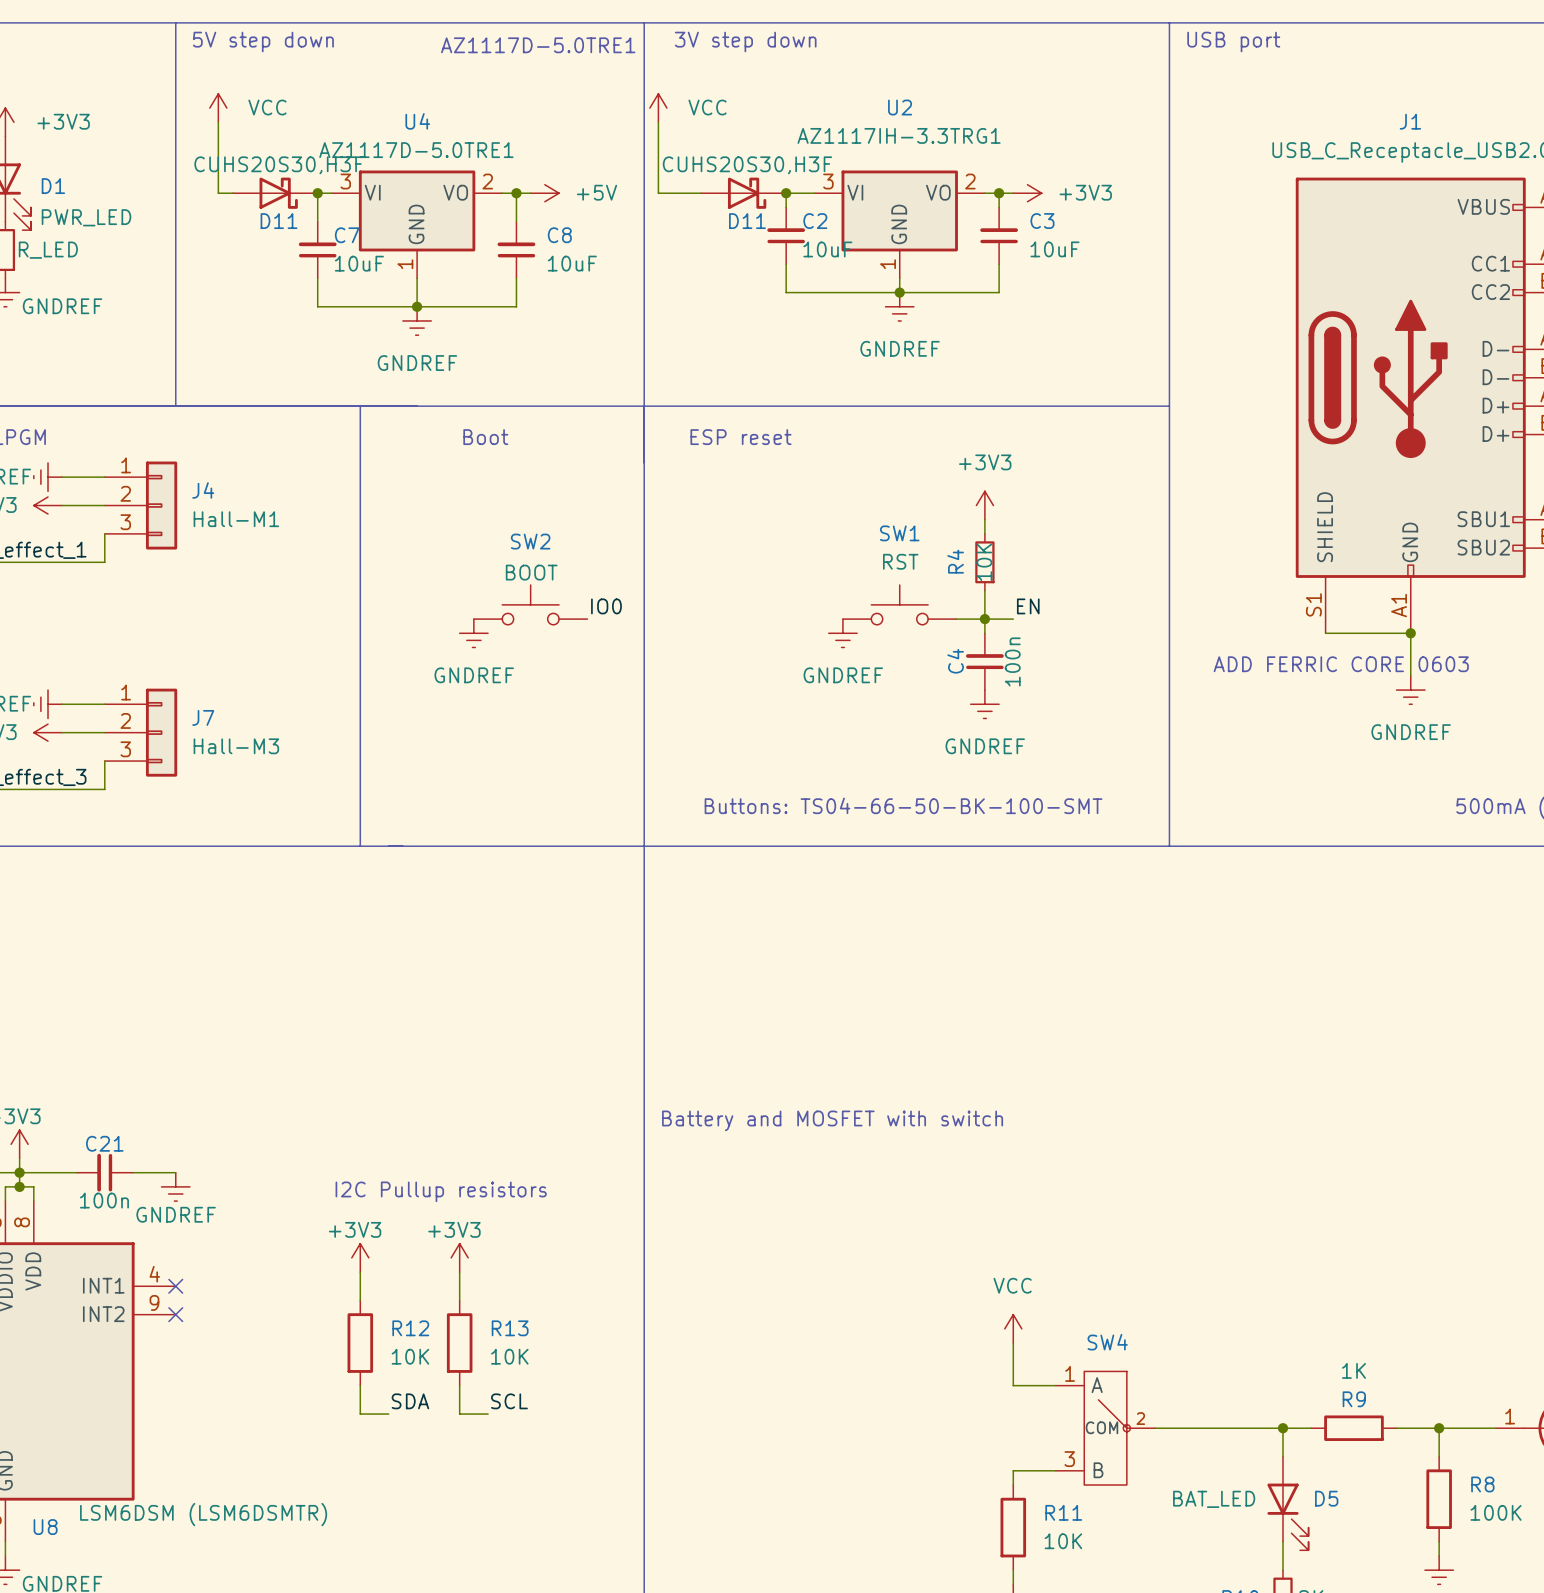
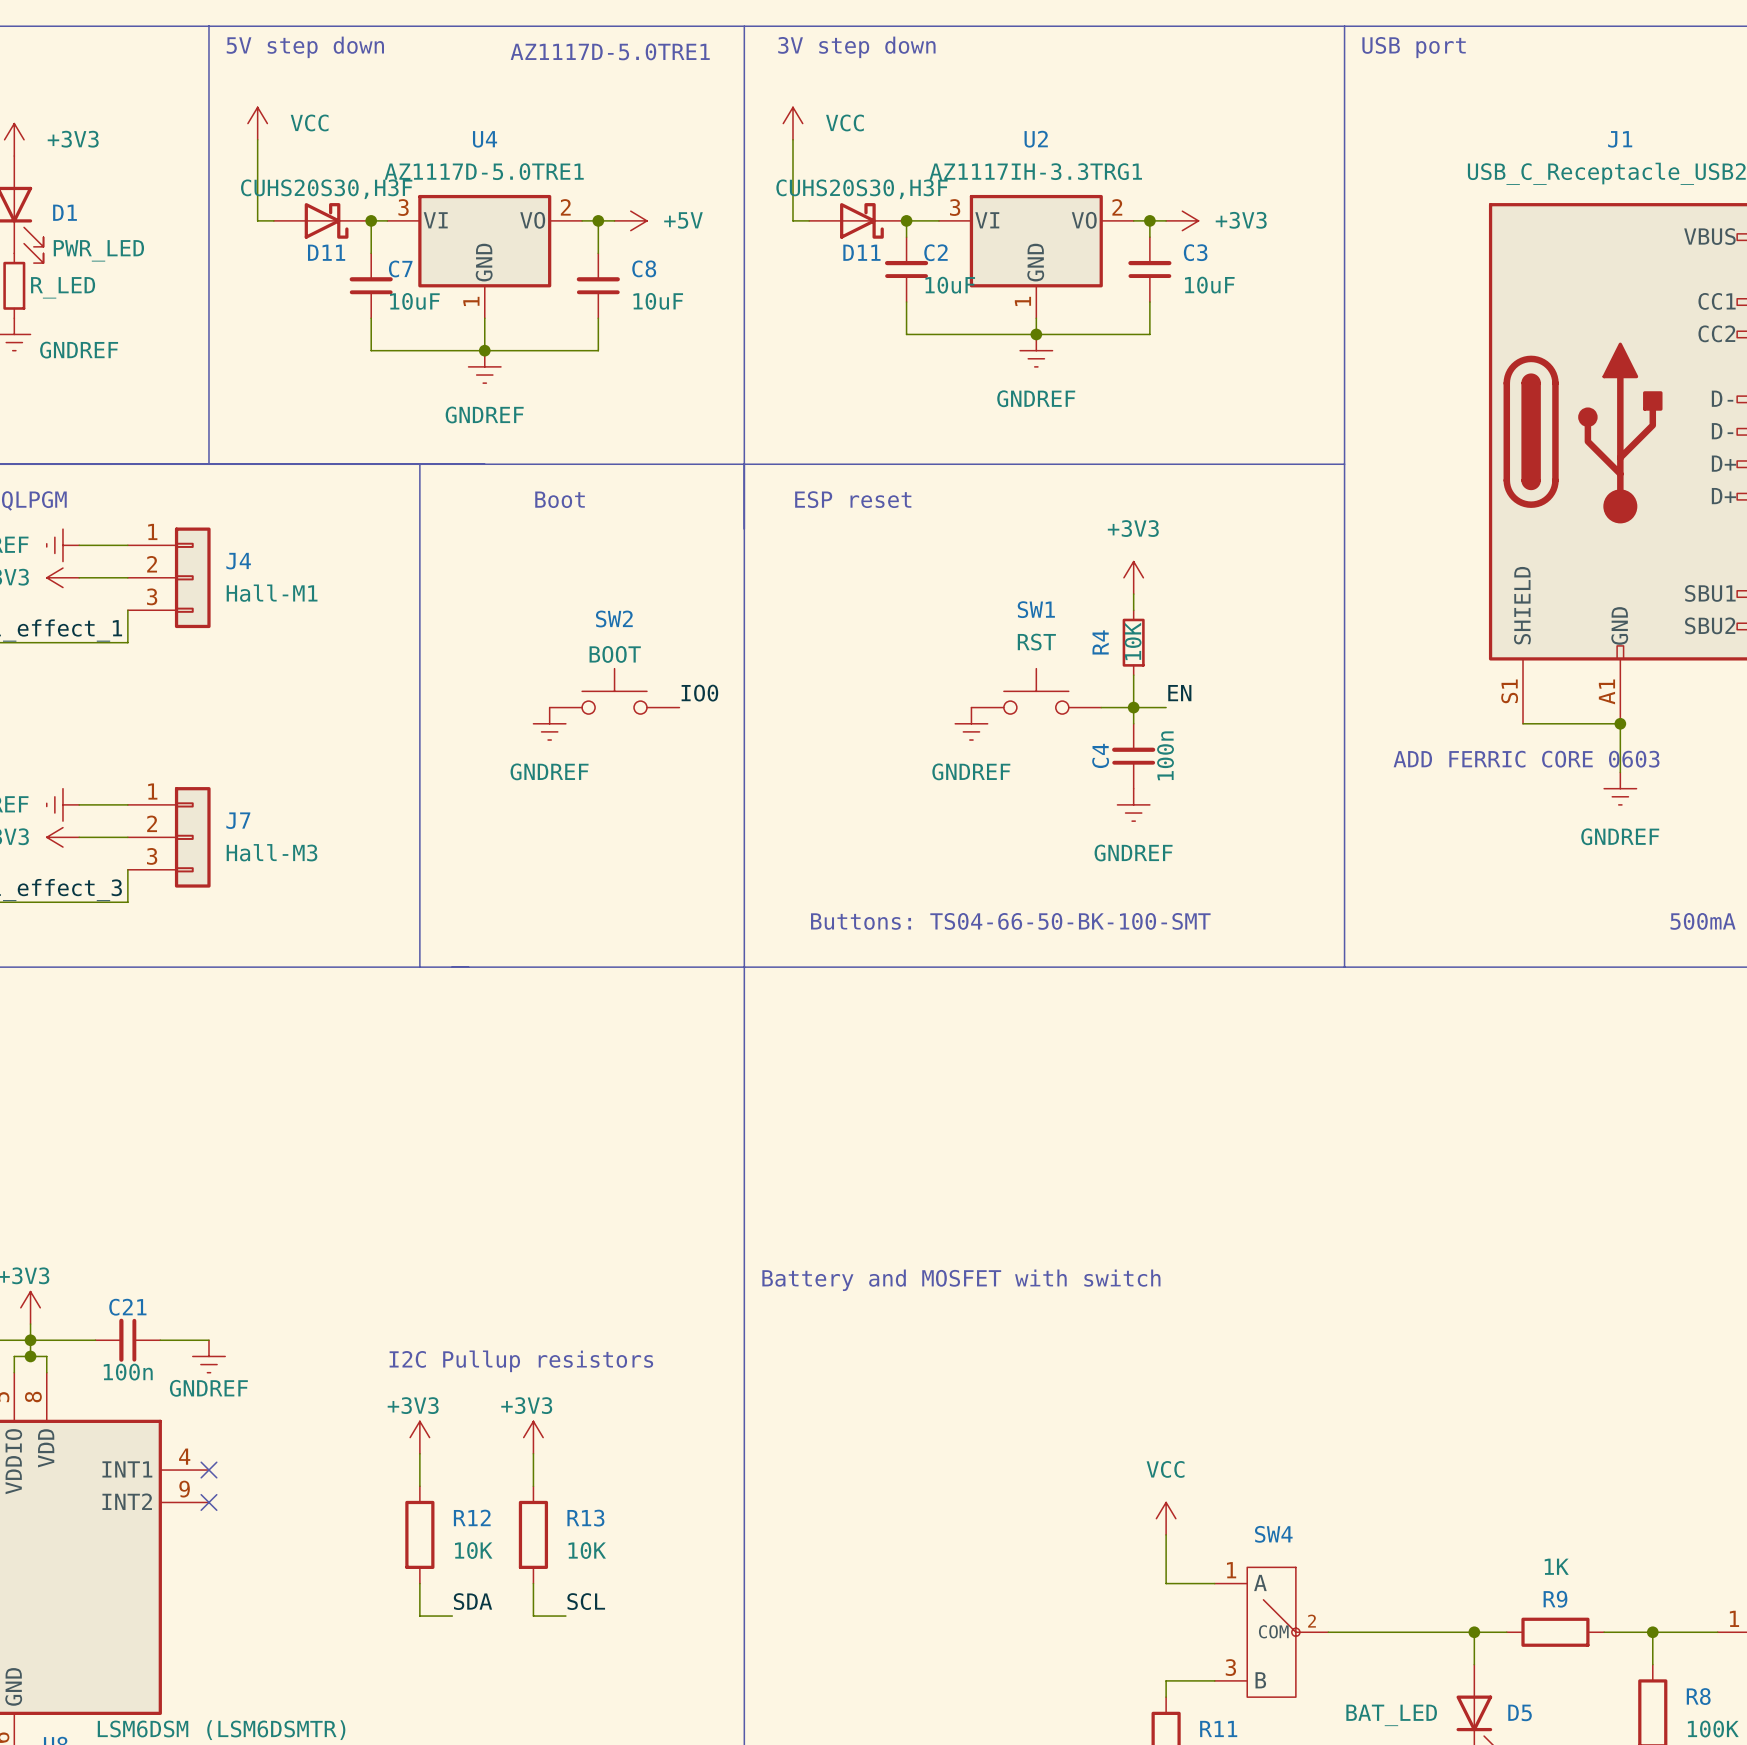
U2 name position: U2 (900, 107) -> U2 (1036, 139)
power symbol position: VCC (658, 108) -> VCC (792, 123)
wire: (658, 122) (658, 193) (686, 193) -> (792, 139) (792, 220)
U2 value position: AZ1117IH-3.3TRG1 (899, 135) -> AZ1117IH-3.3TRG1 (1035, 171)

